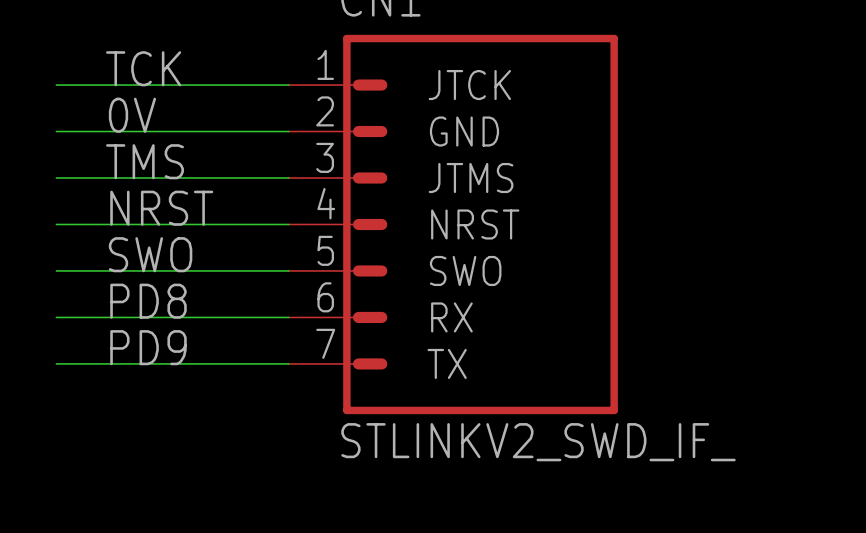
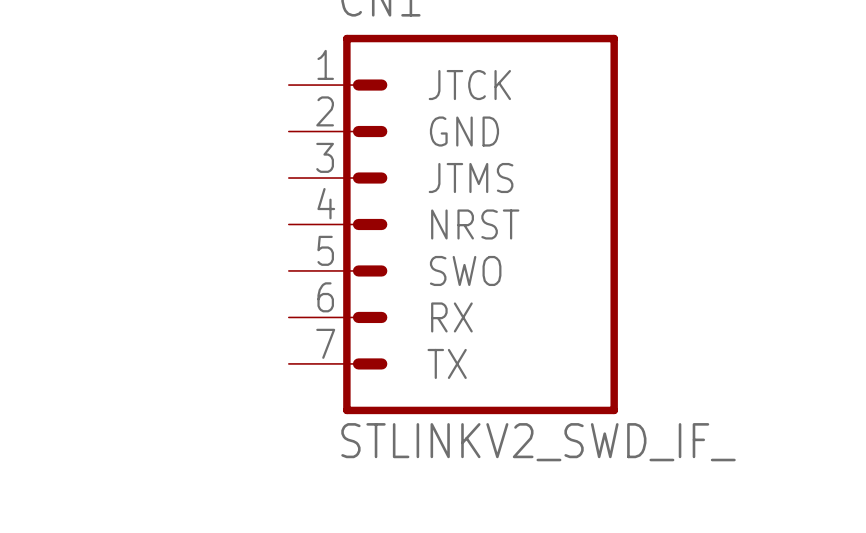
label: TCK (143, 68) -> none
wire: (56, 85) (288, 85) -> none
label: 0V (132, 115) -> none
wire: (56, 131) (288, 131) -> none
label: TMS (145, 161) -> none
wire: (56, 178) (288, 178) -> none
label: NRST (161, 208) -> none
wire: (56, 224) (288, 224) -> none
label: SWO (150, 254) -> none
wire: (56, 270) (288, 270) -> none
label: PD8 (148, 301) -> none
wire: (56, 317) (288, 317) -> none
label: PD9 (148, 347) -> none
wire: (56, 363) (288, 363) -> none

